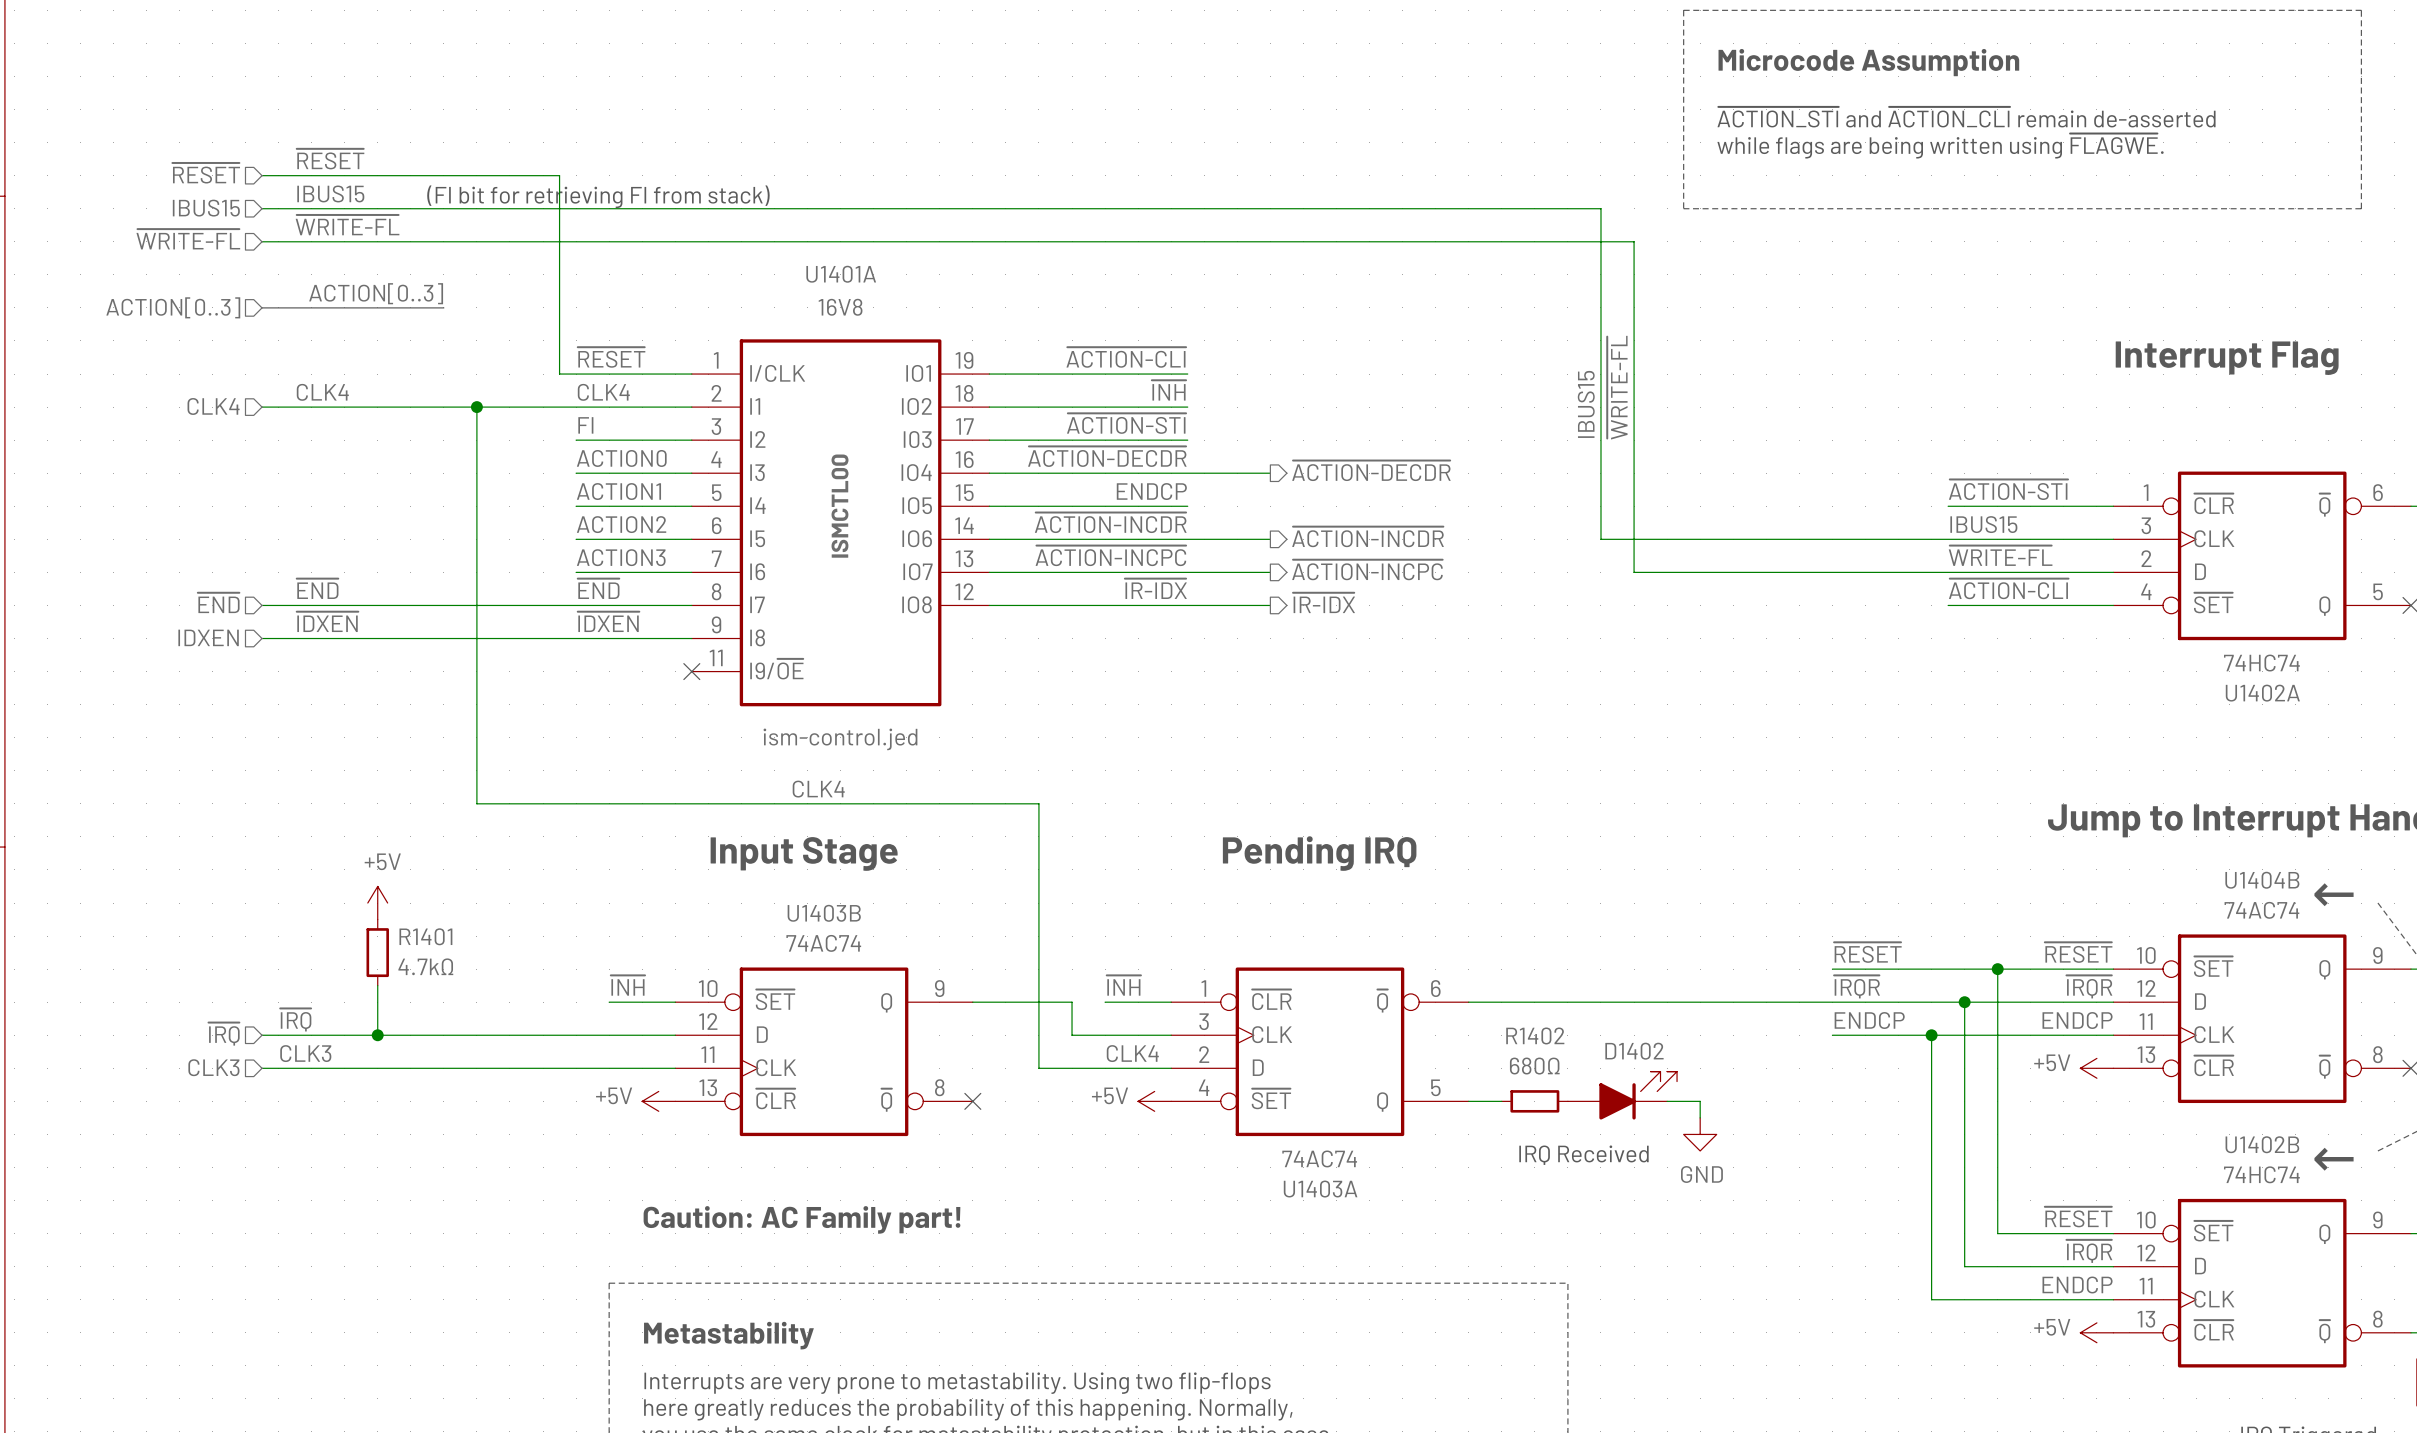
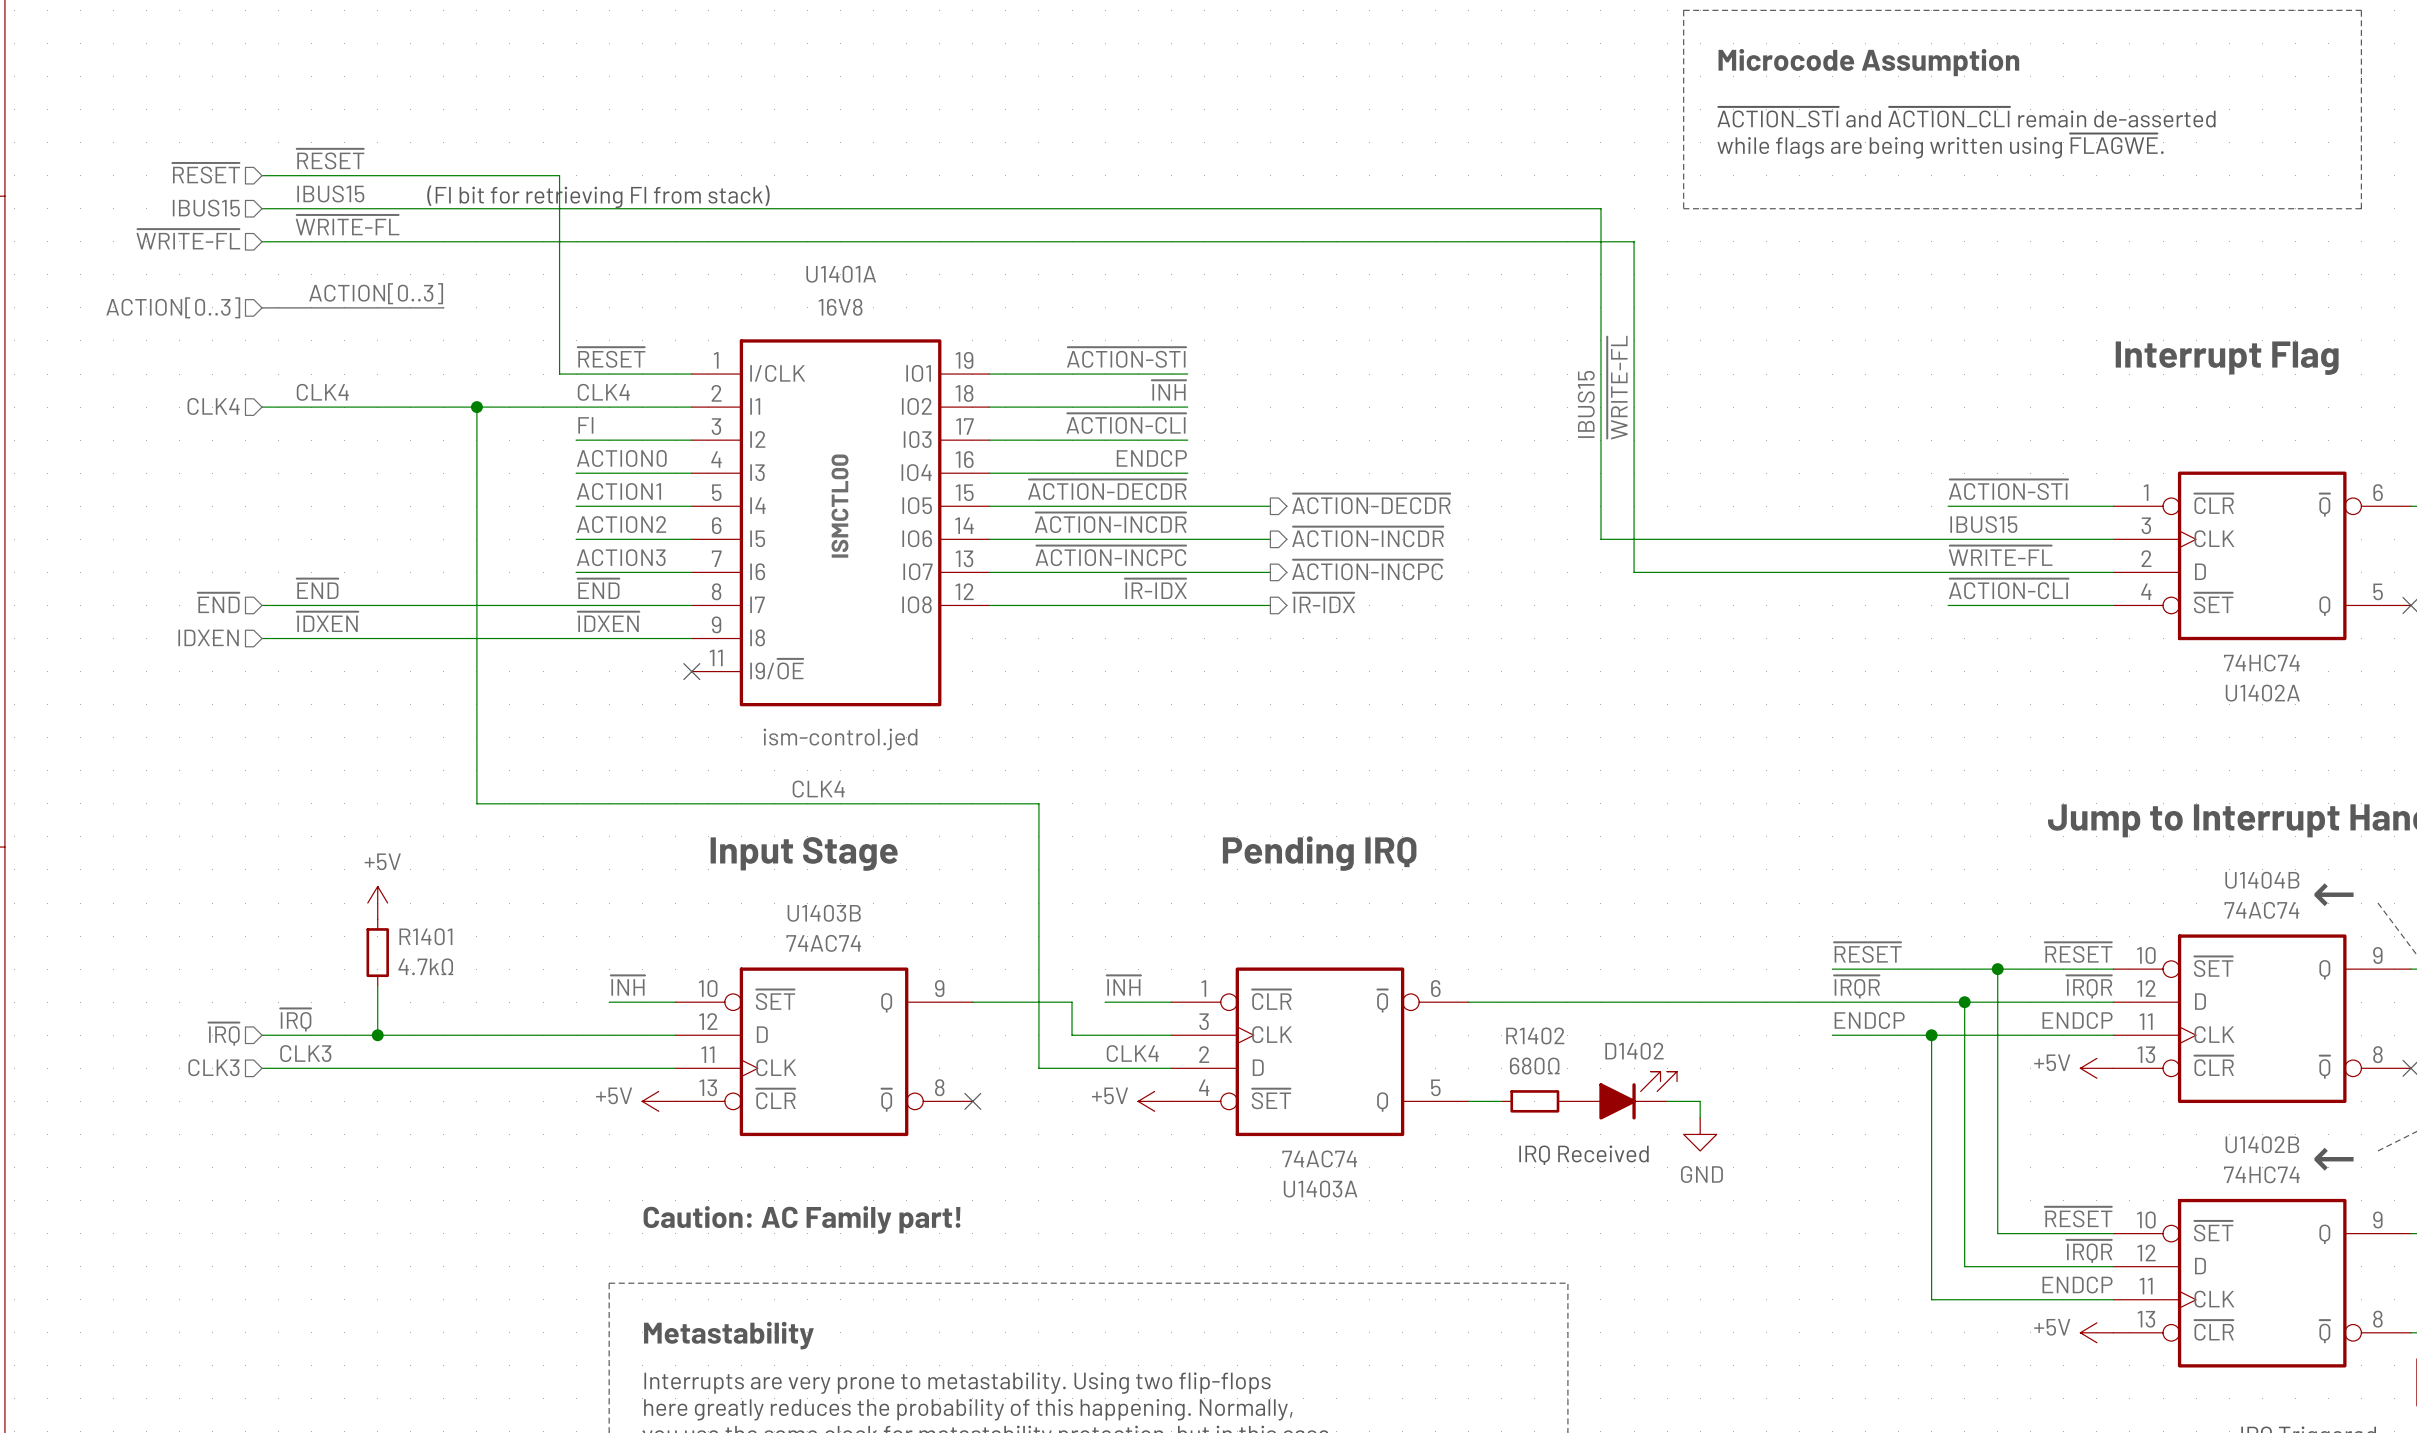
label: ~{ACTION-CLI} (1126, 357) -> ~{ACTION-STI} (1126, 357)
label: ~{ACTION-STI} (1126, 423) -> ~{ACTION-CLI} (1126, 423)
label: ~{ACTION-DECDR} (1107, 456) -> ENDCP (1151, 458)
hierarchical label position: ~{ACTION-DECDR} (1371, 470) -> ~{ACTION-DECDR} (1371, 503)
wire: (1187, 473) (1270, 473) -> (1187, 506) (1270, 506)
label: ENDCP (1151, 491) -> ~{ACTION-DECDR} (1107, 489)

